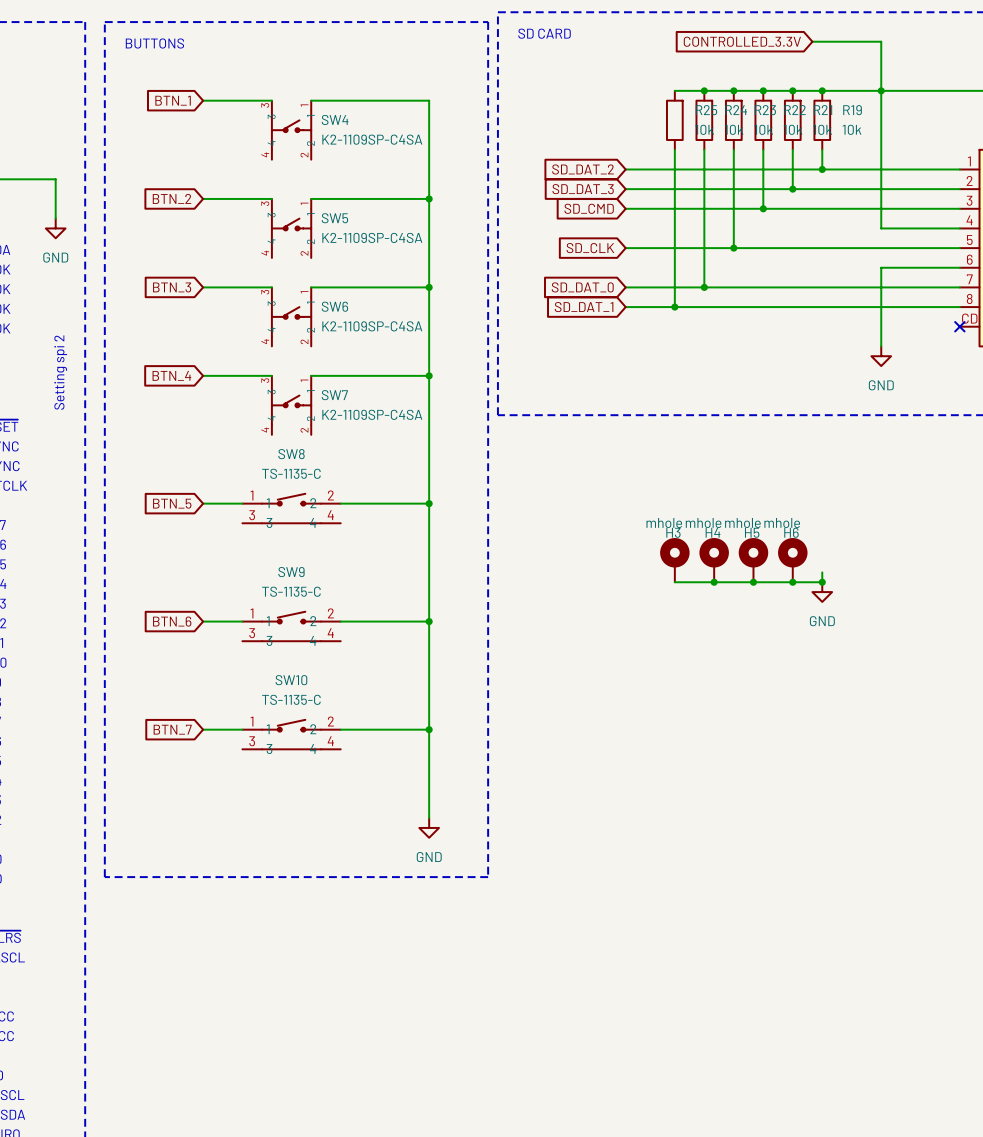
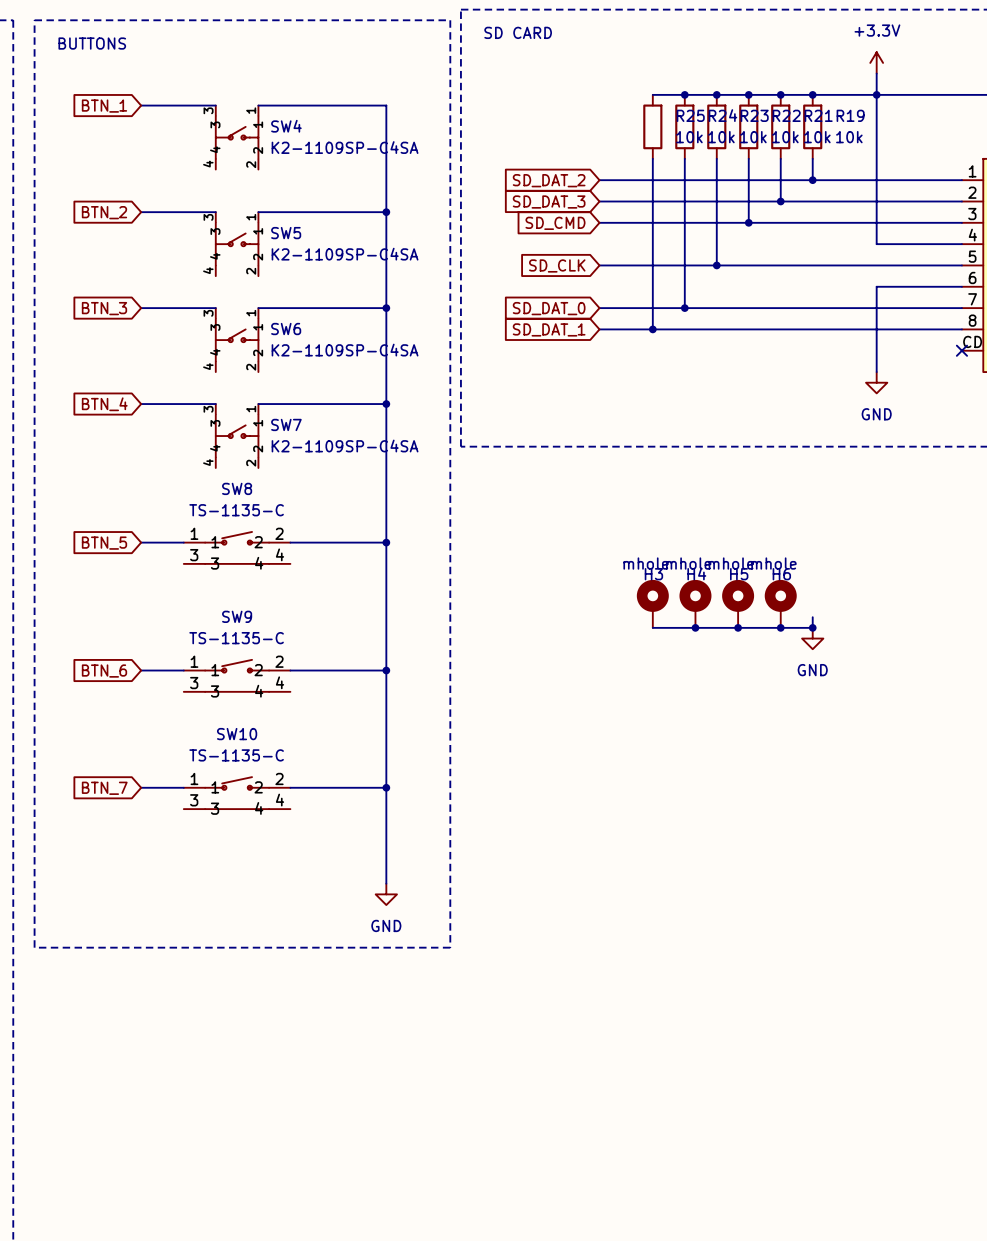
global label: CONTROLLED_3.3V (742, 41) -> none
wire: (812, 41) (881, 41) (881, 71) -> none
power symbol: none -> +3.3V (876, 62)

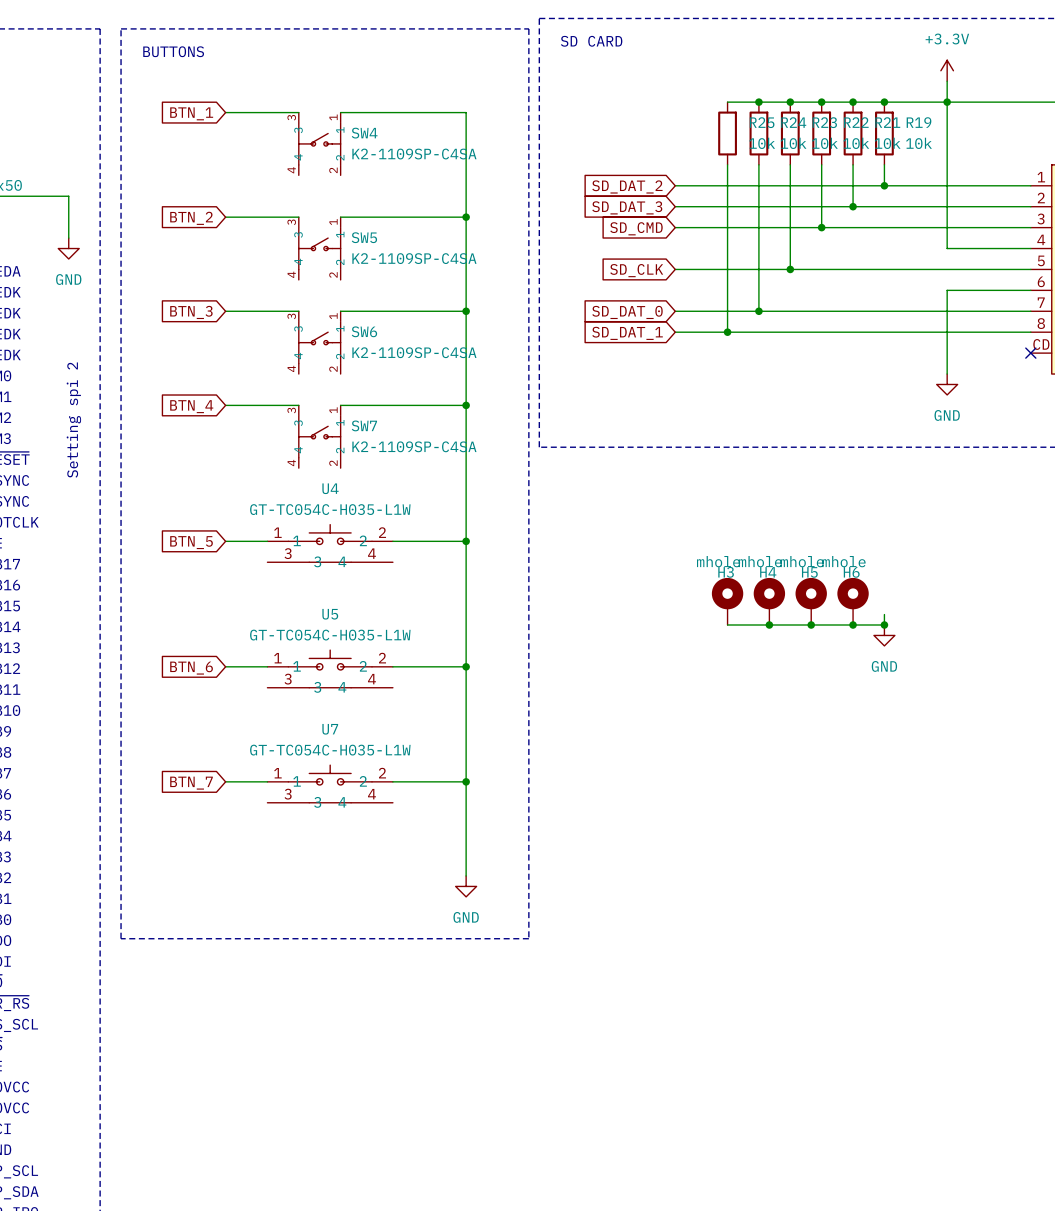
U4: none -> GT-TC054C-H035-L1W (330, 543)
SW8: TS-1135-C (237, 547) -> none
U5: none -> GT-TC054C-H035-L1W (330, 668)
SW9: TS-1135-C (237, 675) -> none
U7: none -> GT-TC054C-H035-L1W (330, 783)
SW10: TS-1135-C (237, 793) -> none

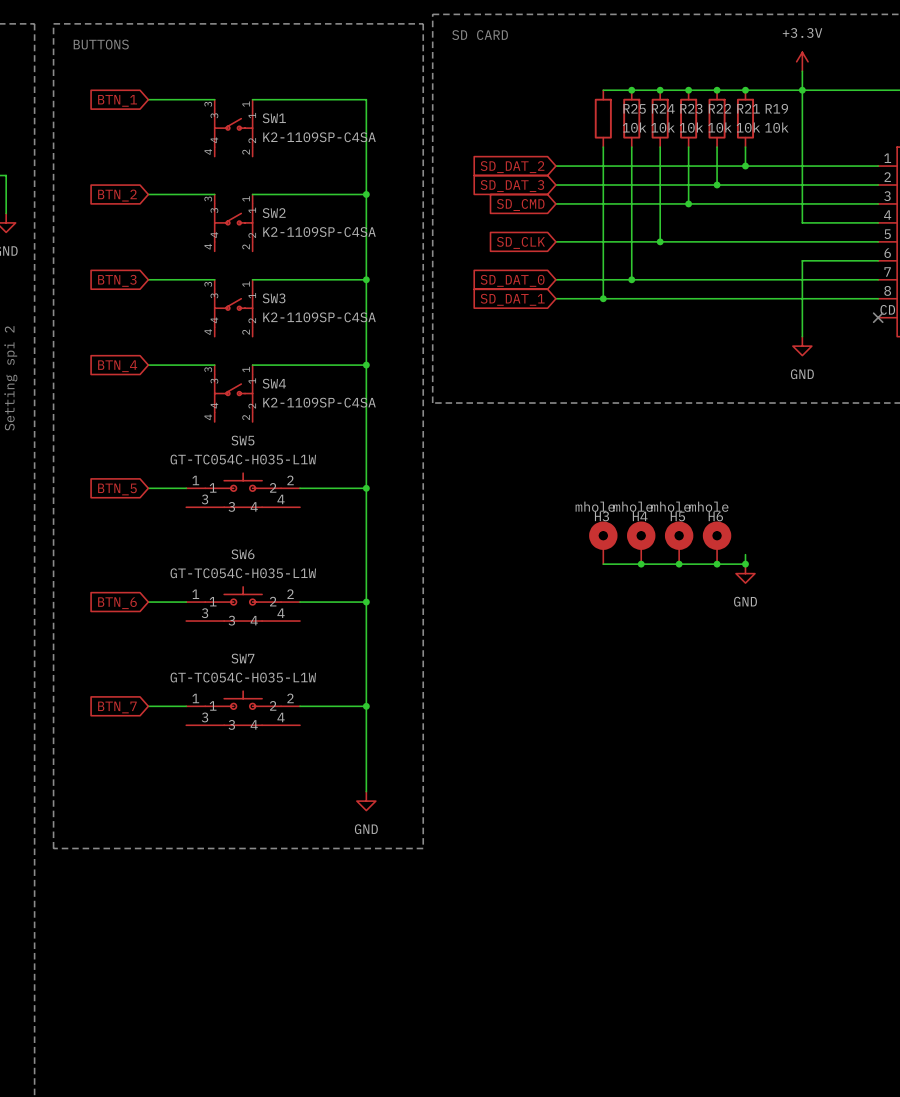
SW4 name: SW4 (364, 133) -> SW1 (274, 118)
SW5 name: SW5 (364, 237) -> SW2 (274, 213)
SW6 name: SW6 (364, 331) -> SW3 (274, 298)
SW7 name: SW7 (364, 425) -> SW4 (274, 383)
U4 name: U4 (330, 488) -> SW5 (242, 440)
U5 name: U5 (330, 614) -> SW6 (243, 554)
U7 name: U7 (330, 729) -> SW7 (242, 658)

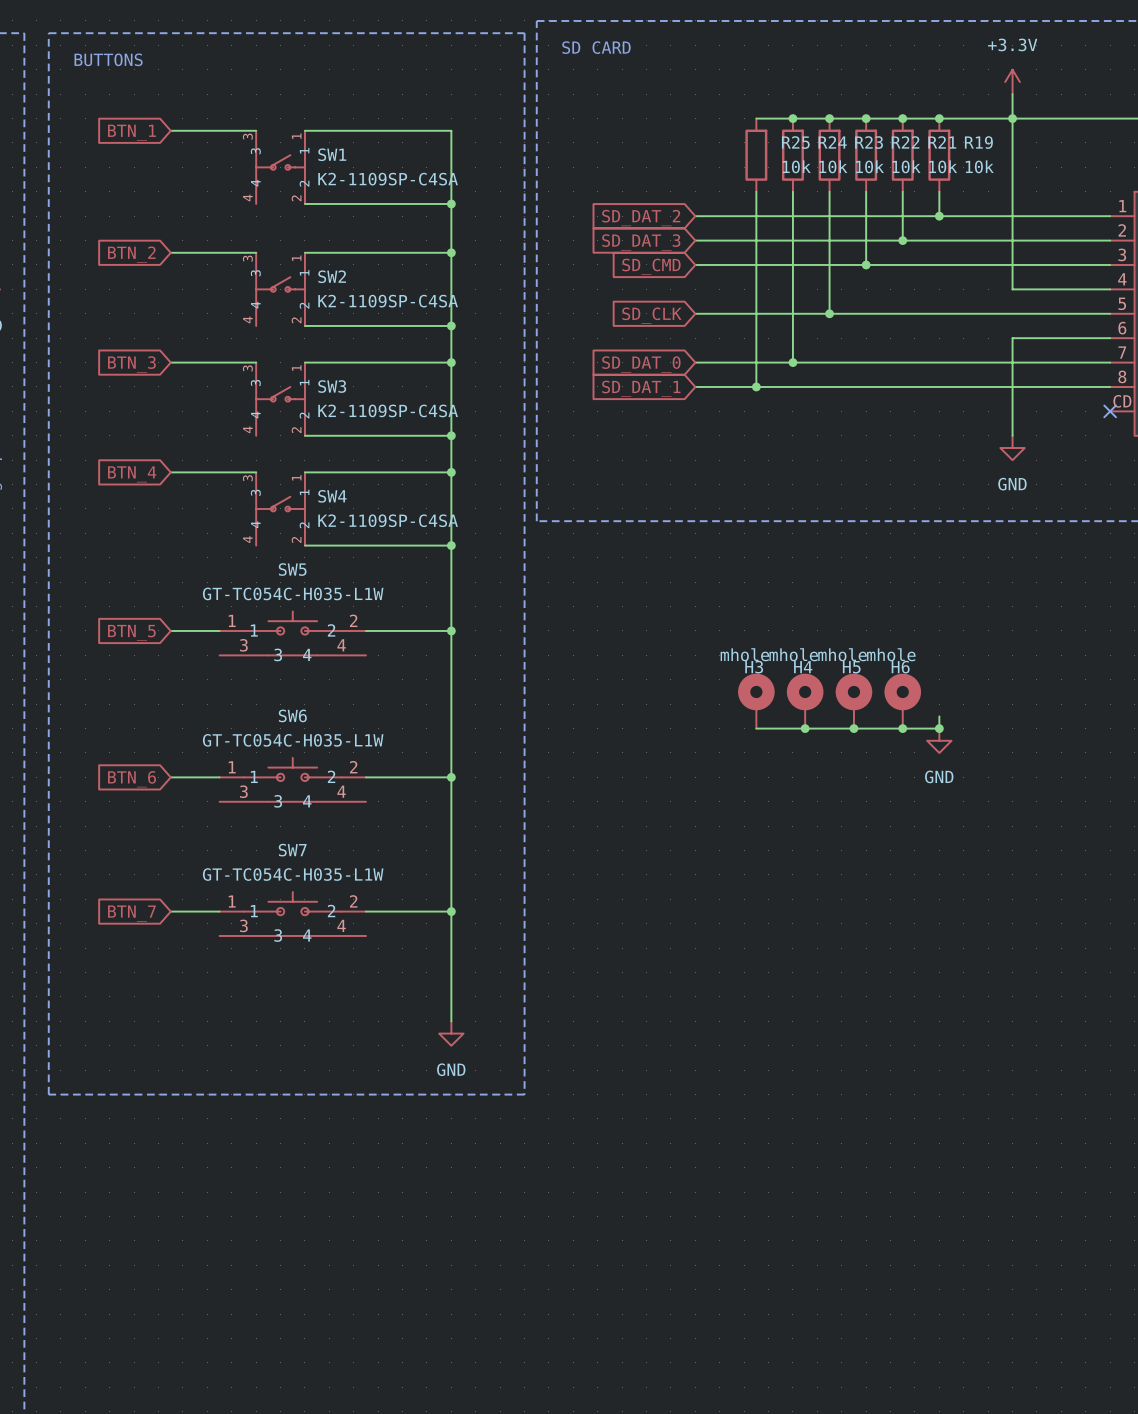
wire: none -> (304, 203) (451, 203)
junction: none -> (451, 203)
wire: none -> (304, 325) (451, 325)
junction: none -> (451, 325)
wire: none -> (304, 435) (451, 435)
junction: none -> (451, 435)
wire: none -> (304, 545) (451, 545)
junction: none -> (451, 545)

